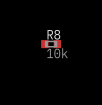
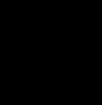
R8: 10k (51, 44) -> none

